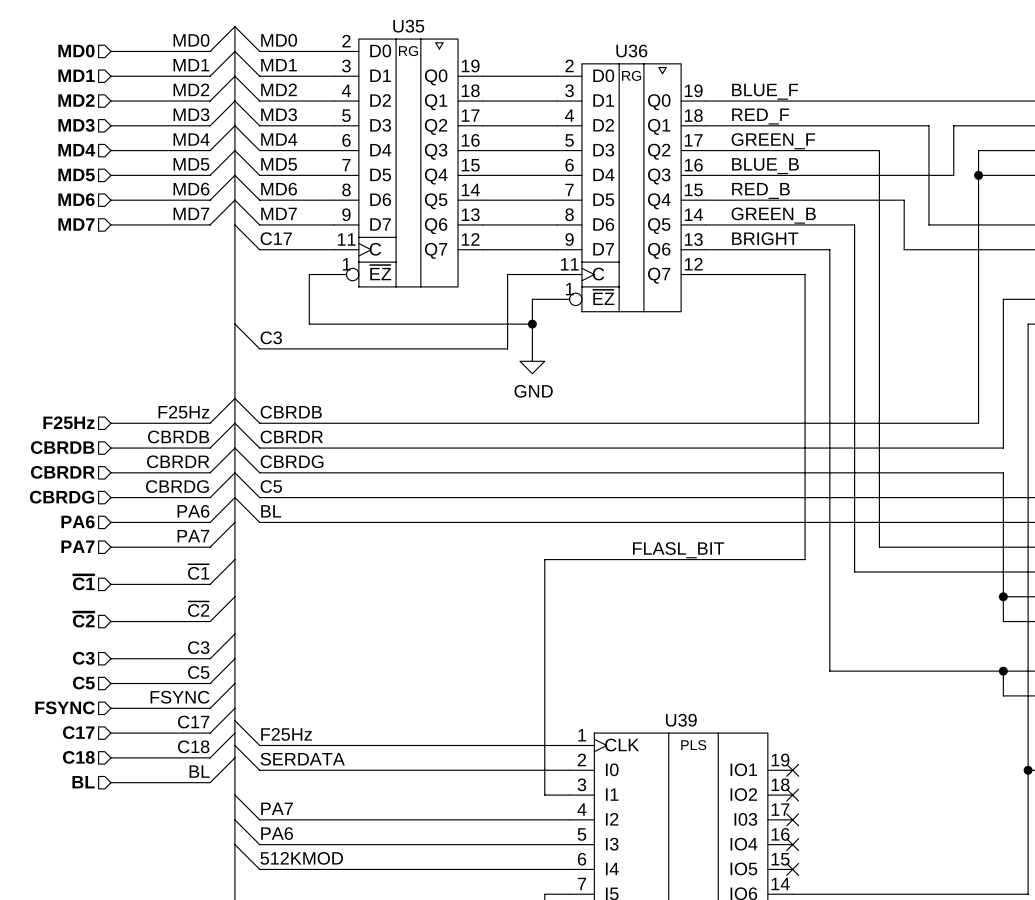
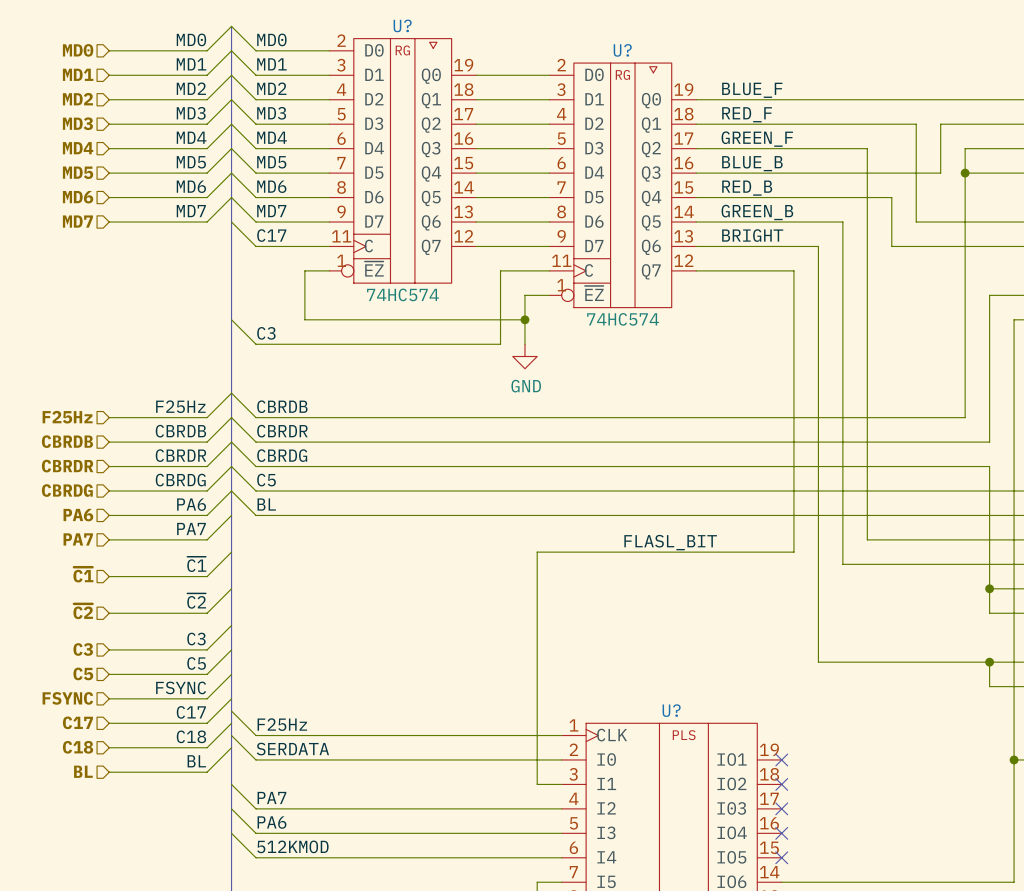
U35 name: U35 (408, 26) -> U? (402, 25)
U36 name: U36 (631, 50) -> U? (622, 50)
U35 value: none -> 74HC574 (402, 294)
U36 value: none -> 74HC574 (623, 319)
U39 name: U39 (681, 720) -> U? (671, 710)

